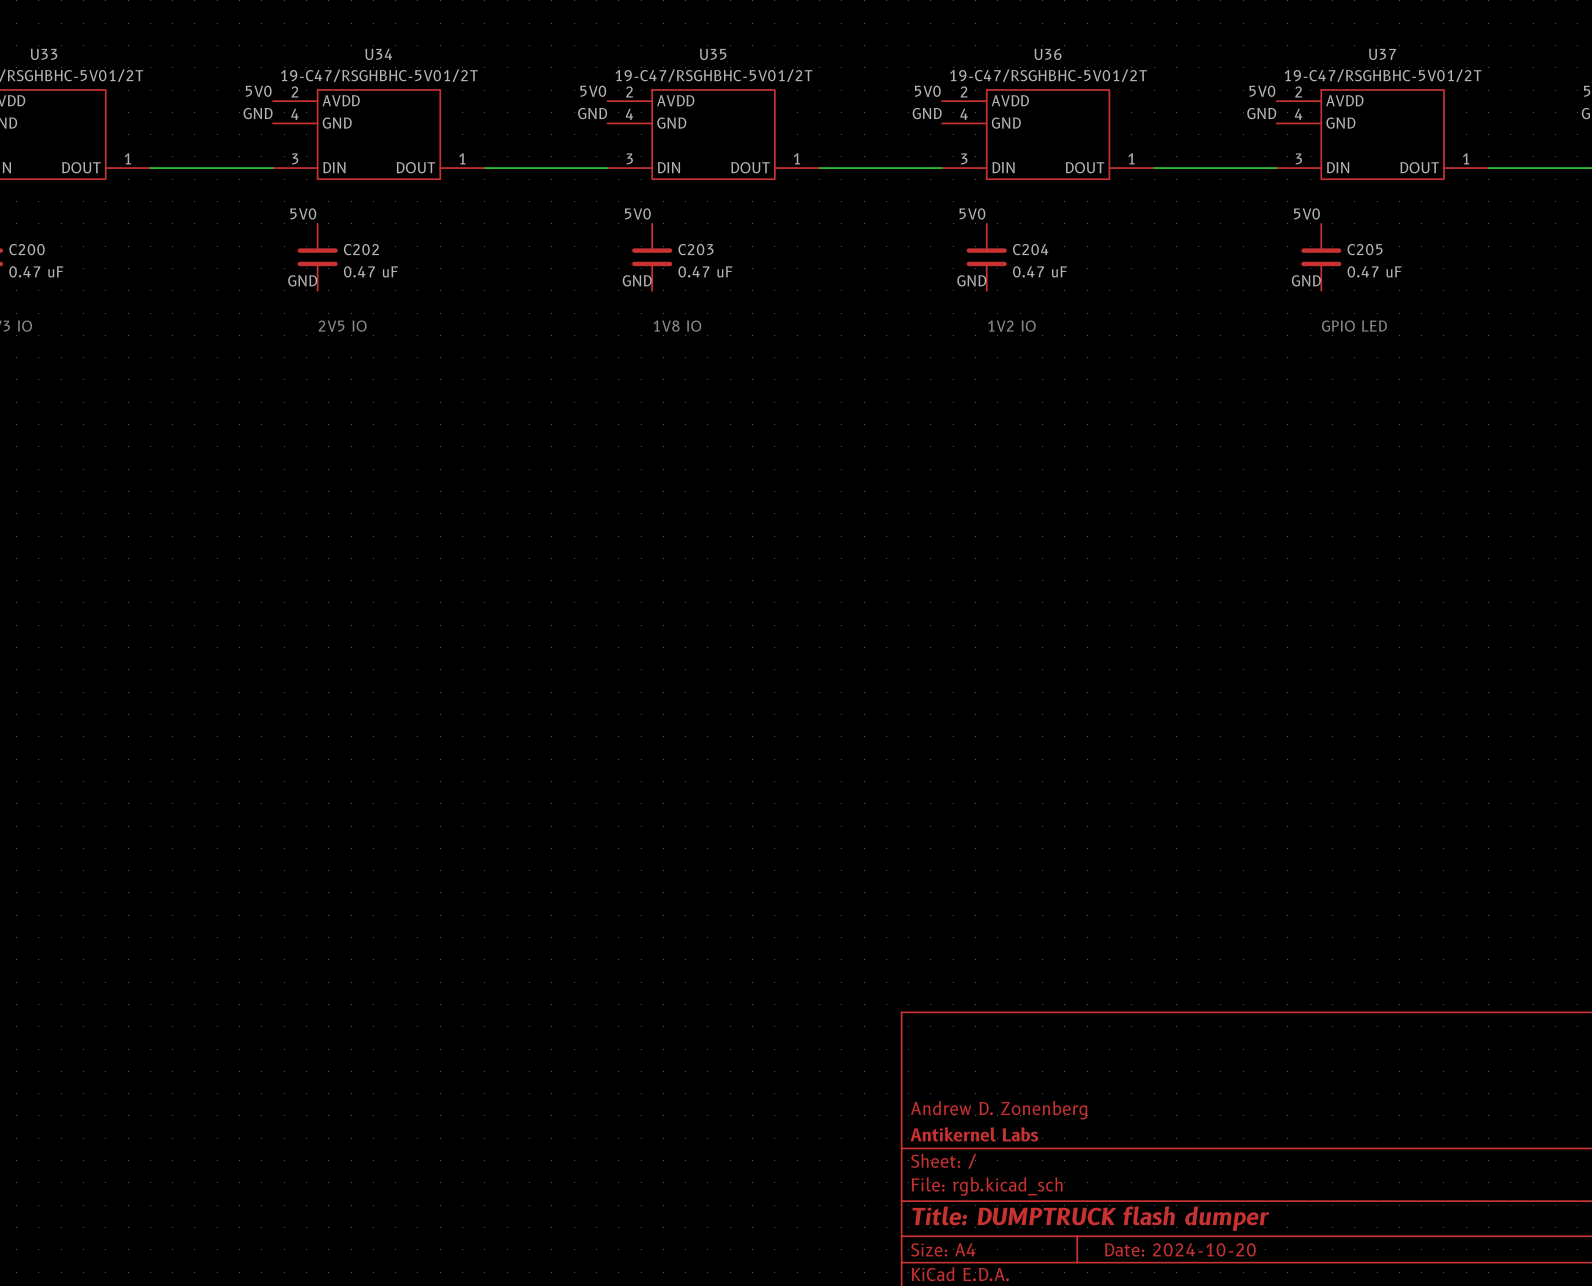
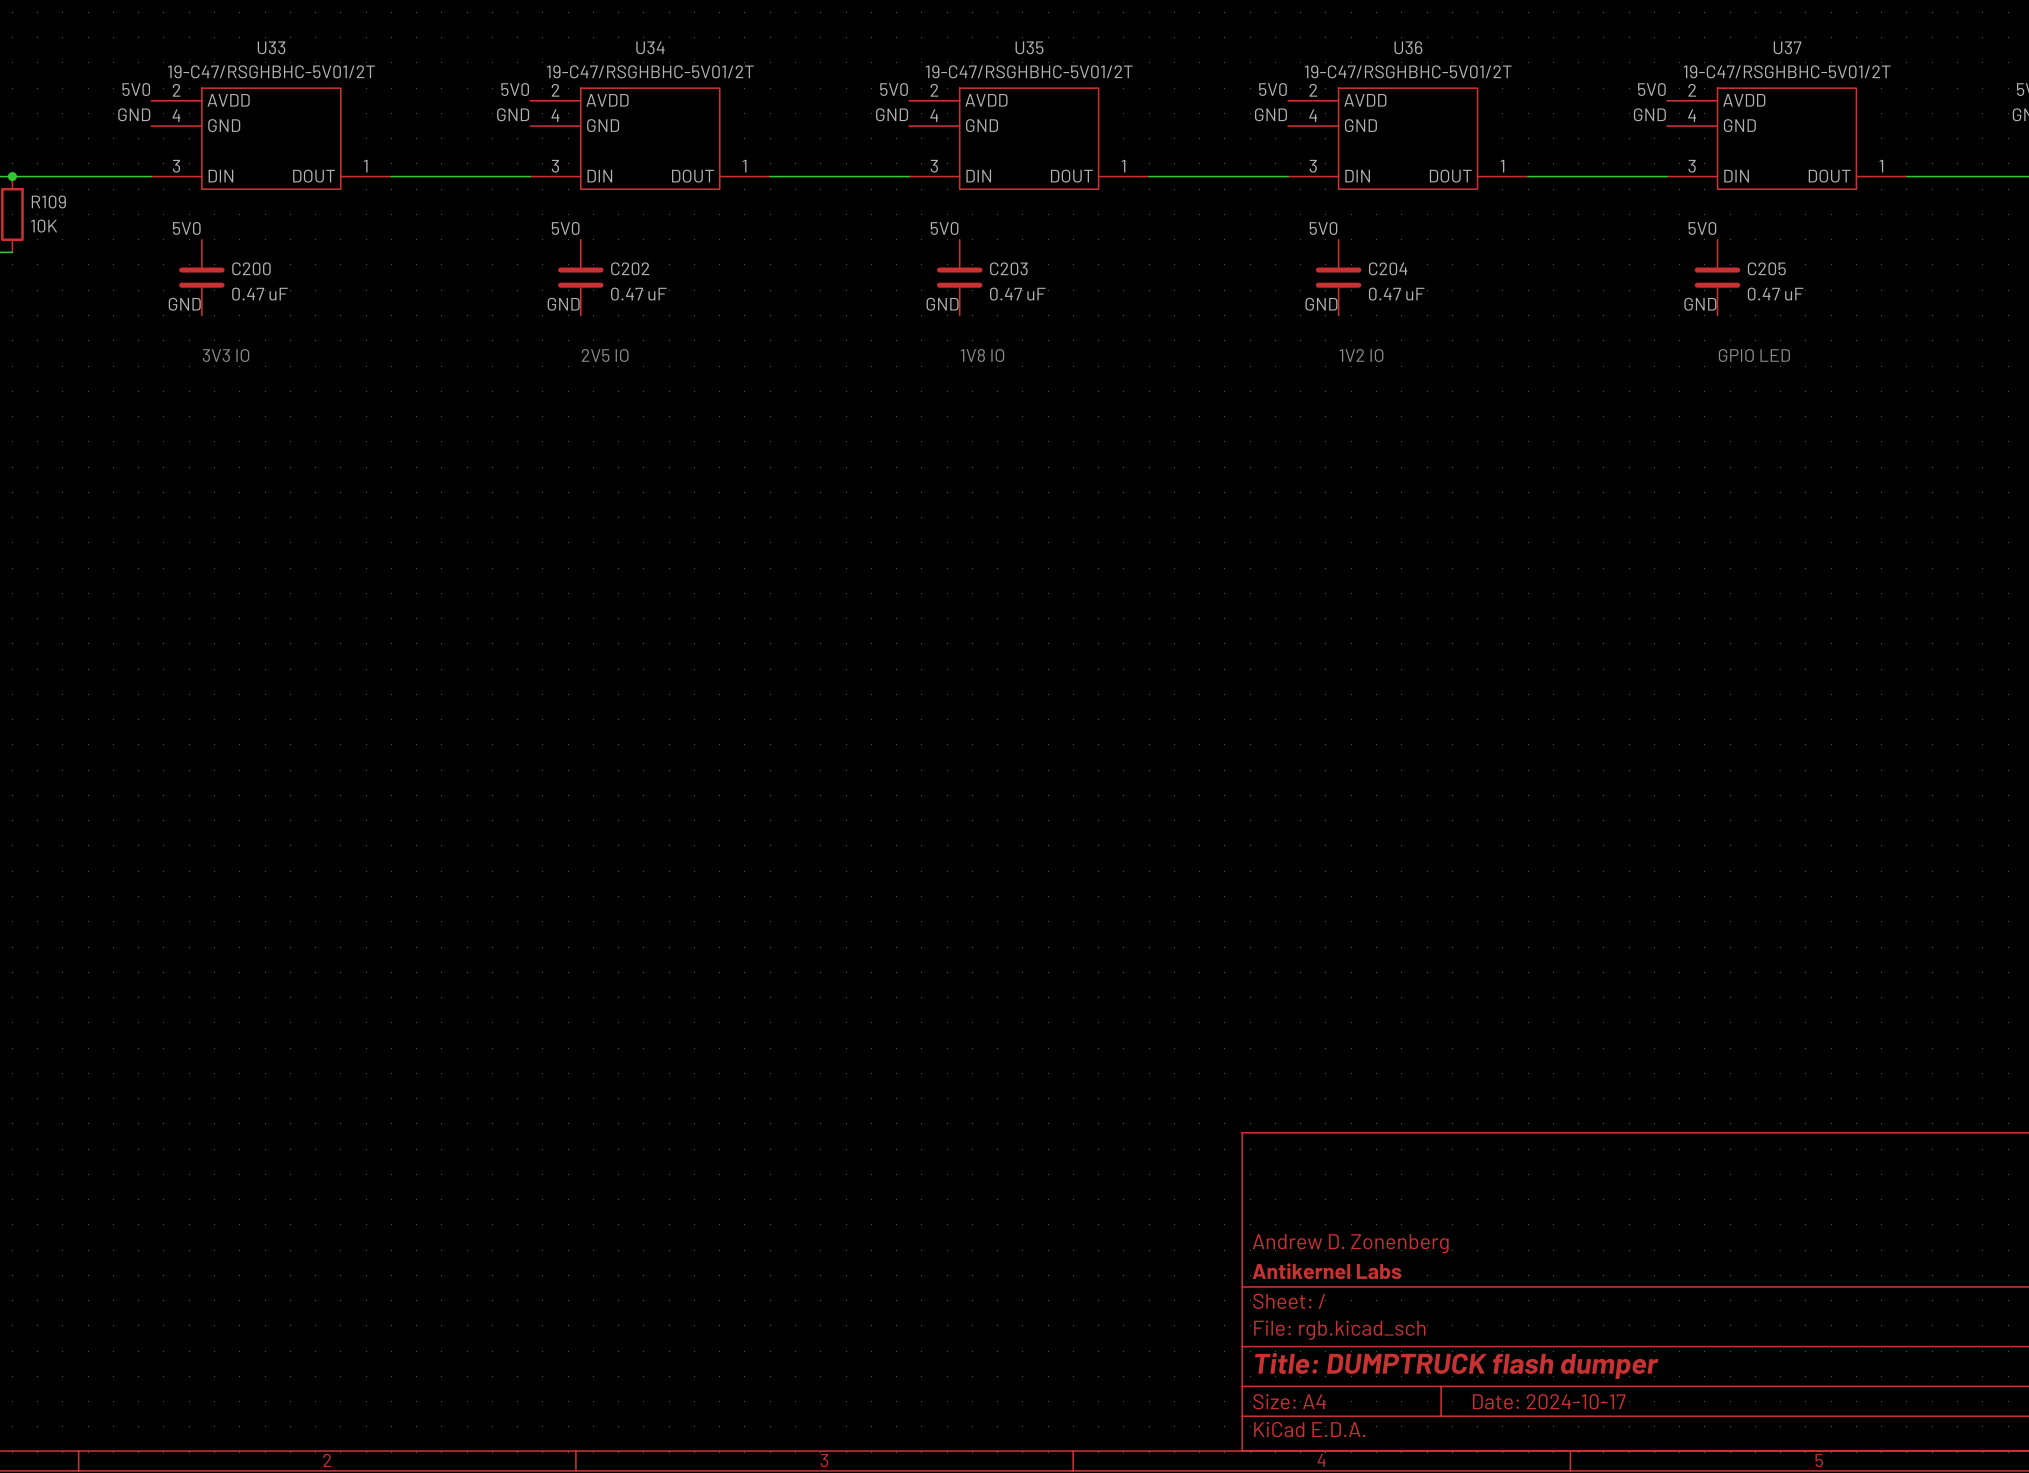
title block: Date: 2024-10-20 (1180, 1249) -> Date: 2024-10-17 (1549, 1401)

